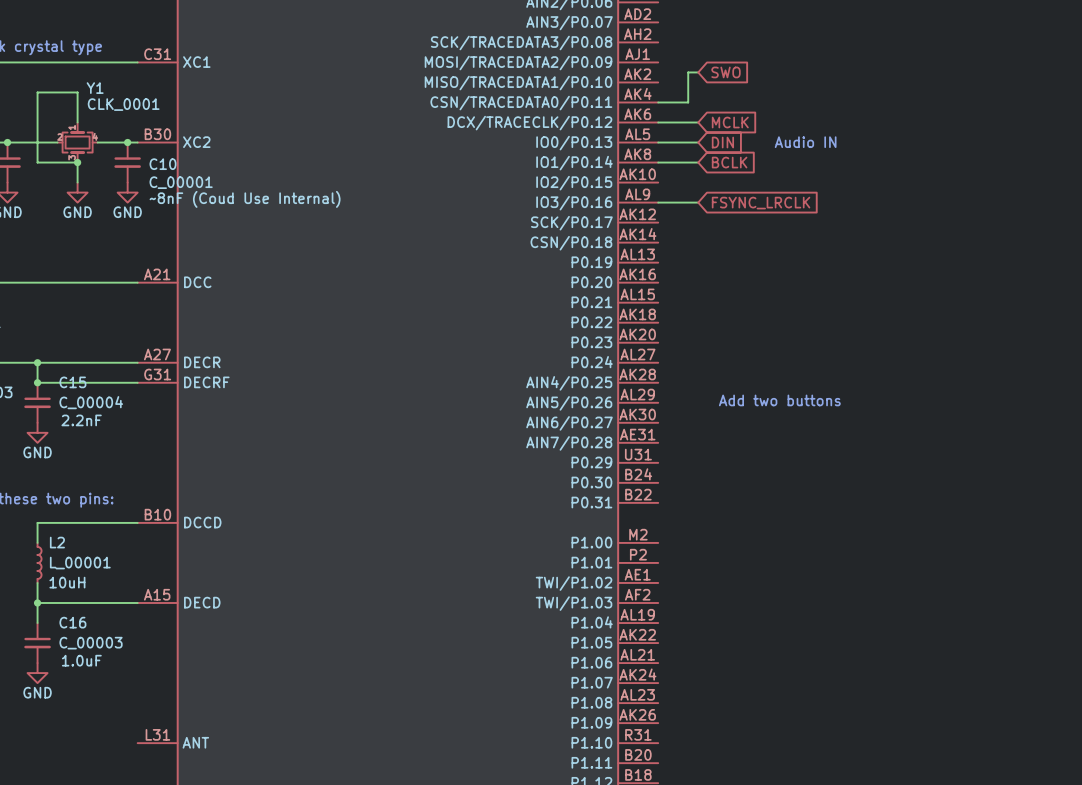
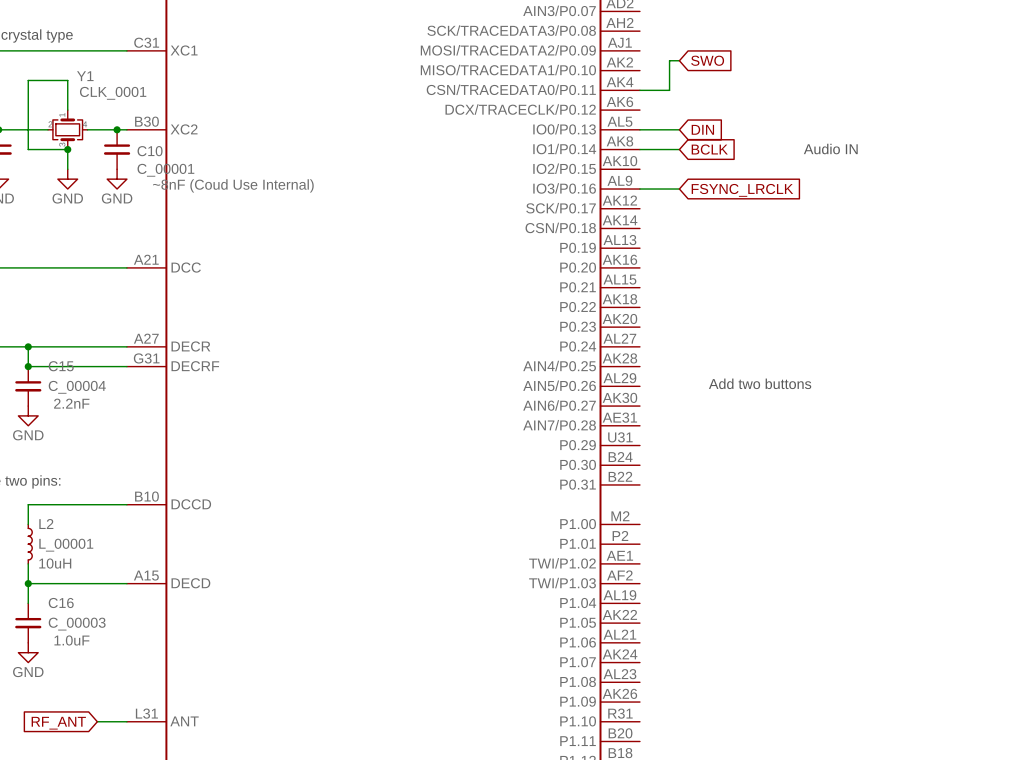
wire: (658, 122) (698, 122) -> none
global label: MCLK (730, 122) -> none
text position: Audio IN (805, 142) -> Audio IN (830, 149)
global label: none -> RF_ANT (58, 723)
wire: none -> (97, 721) (126, 721)

